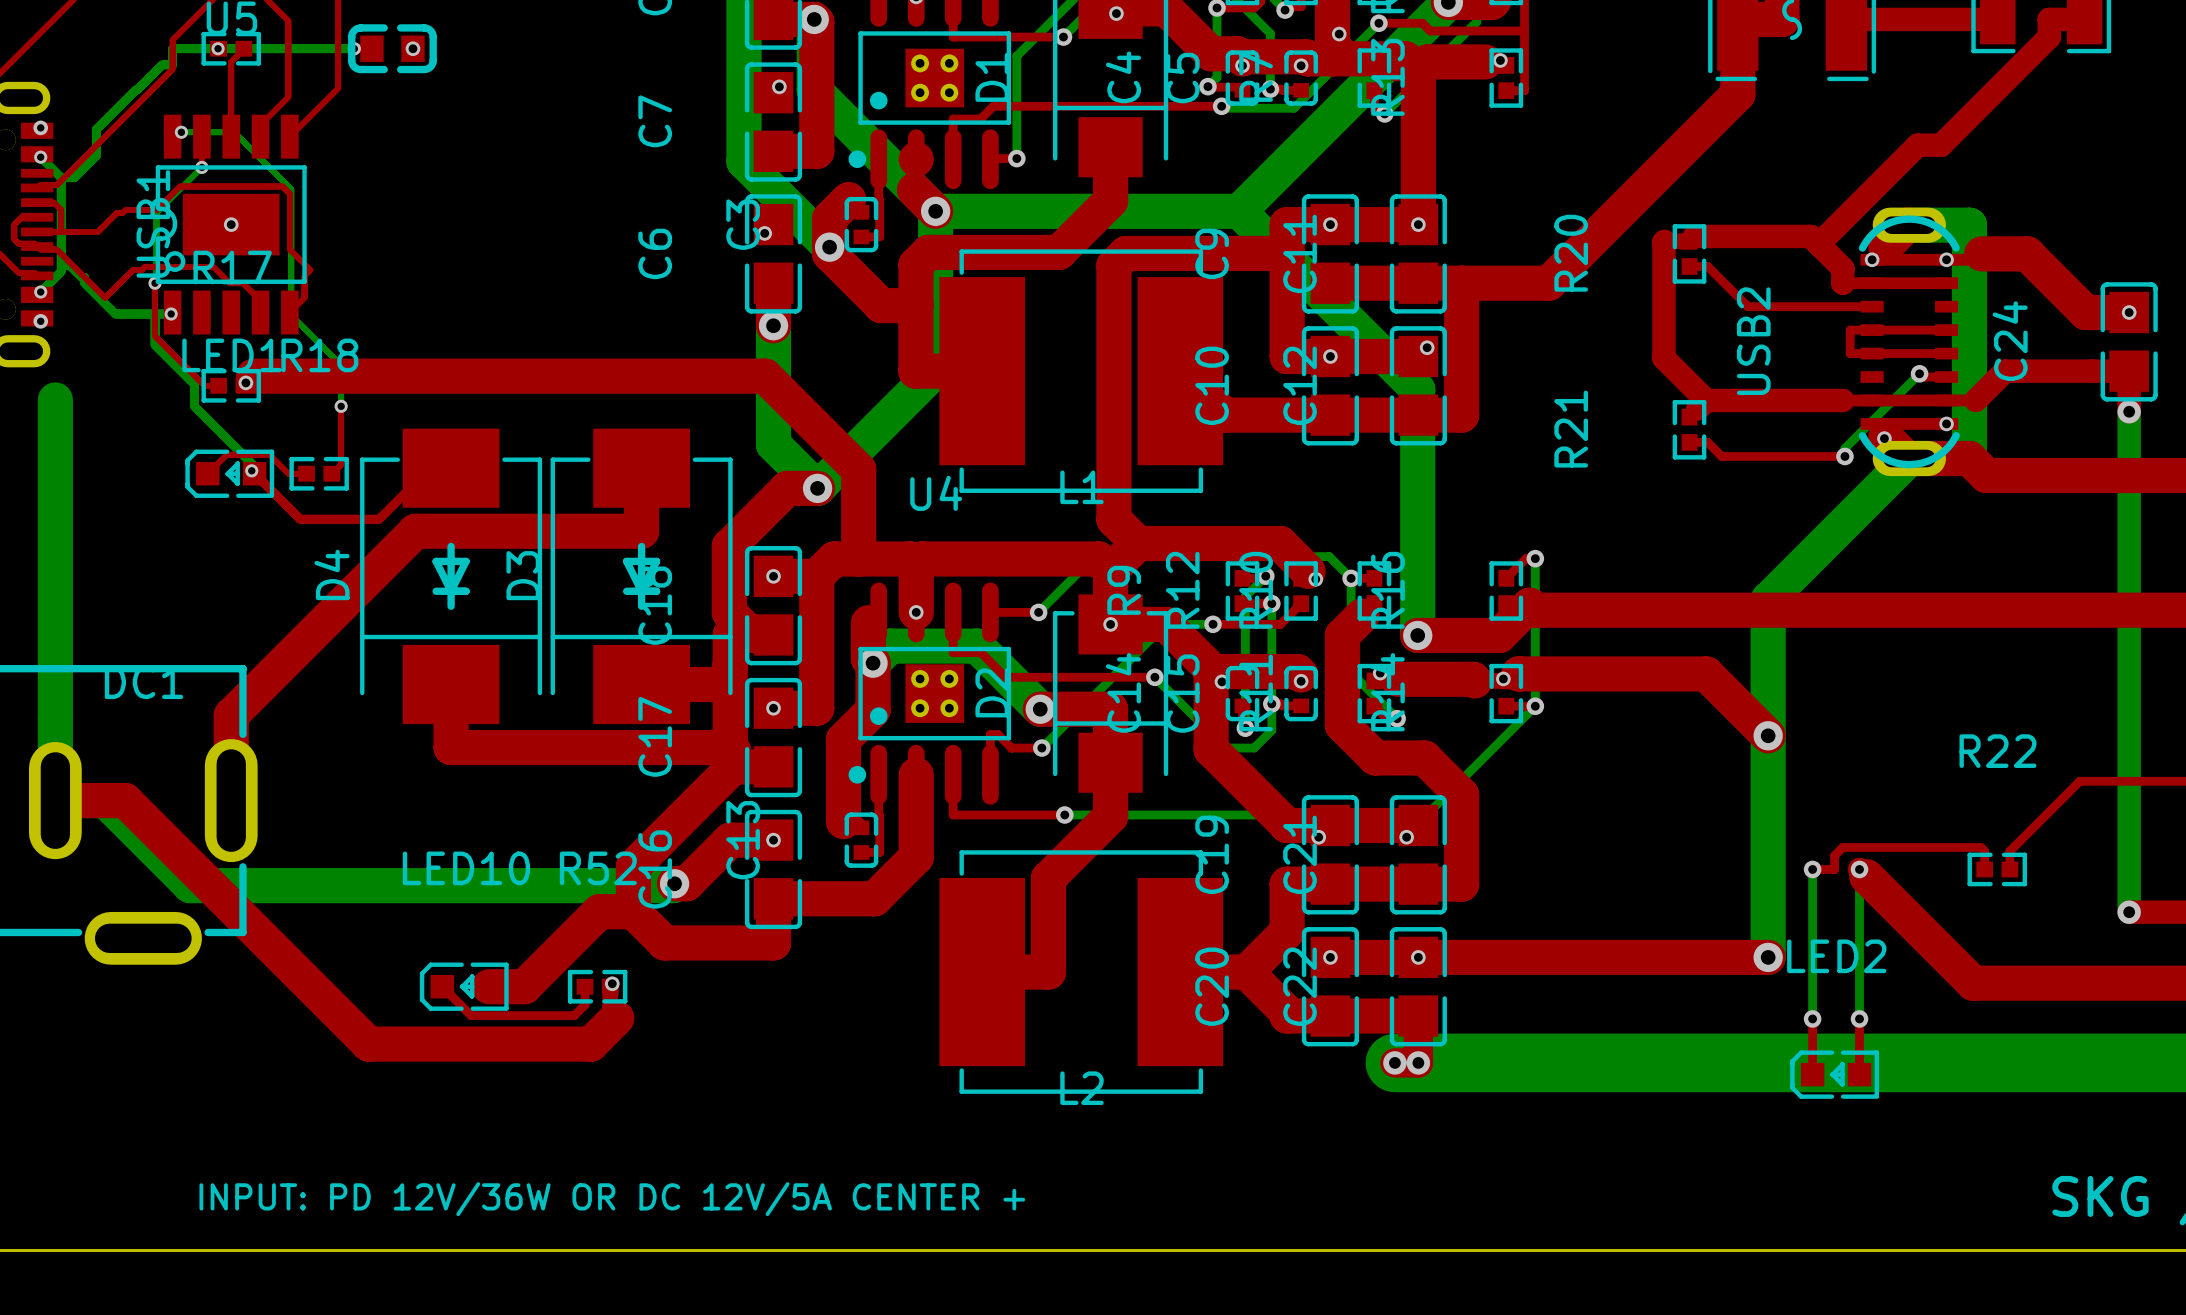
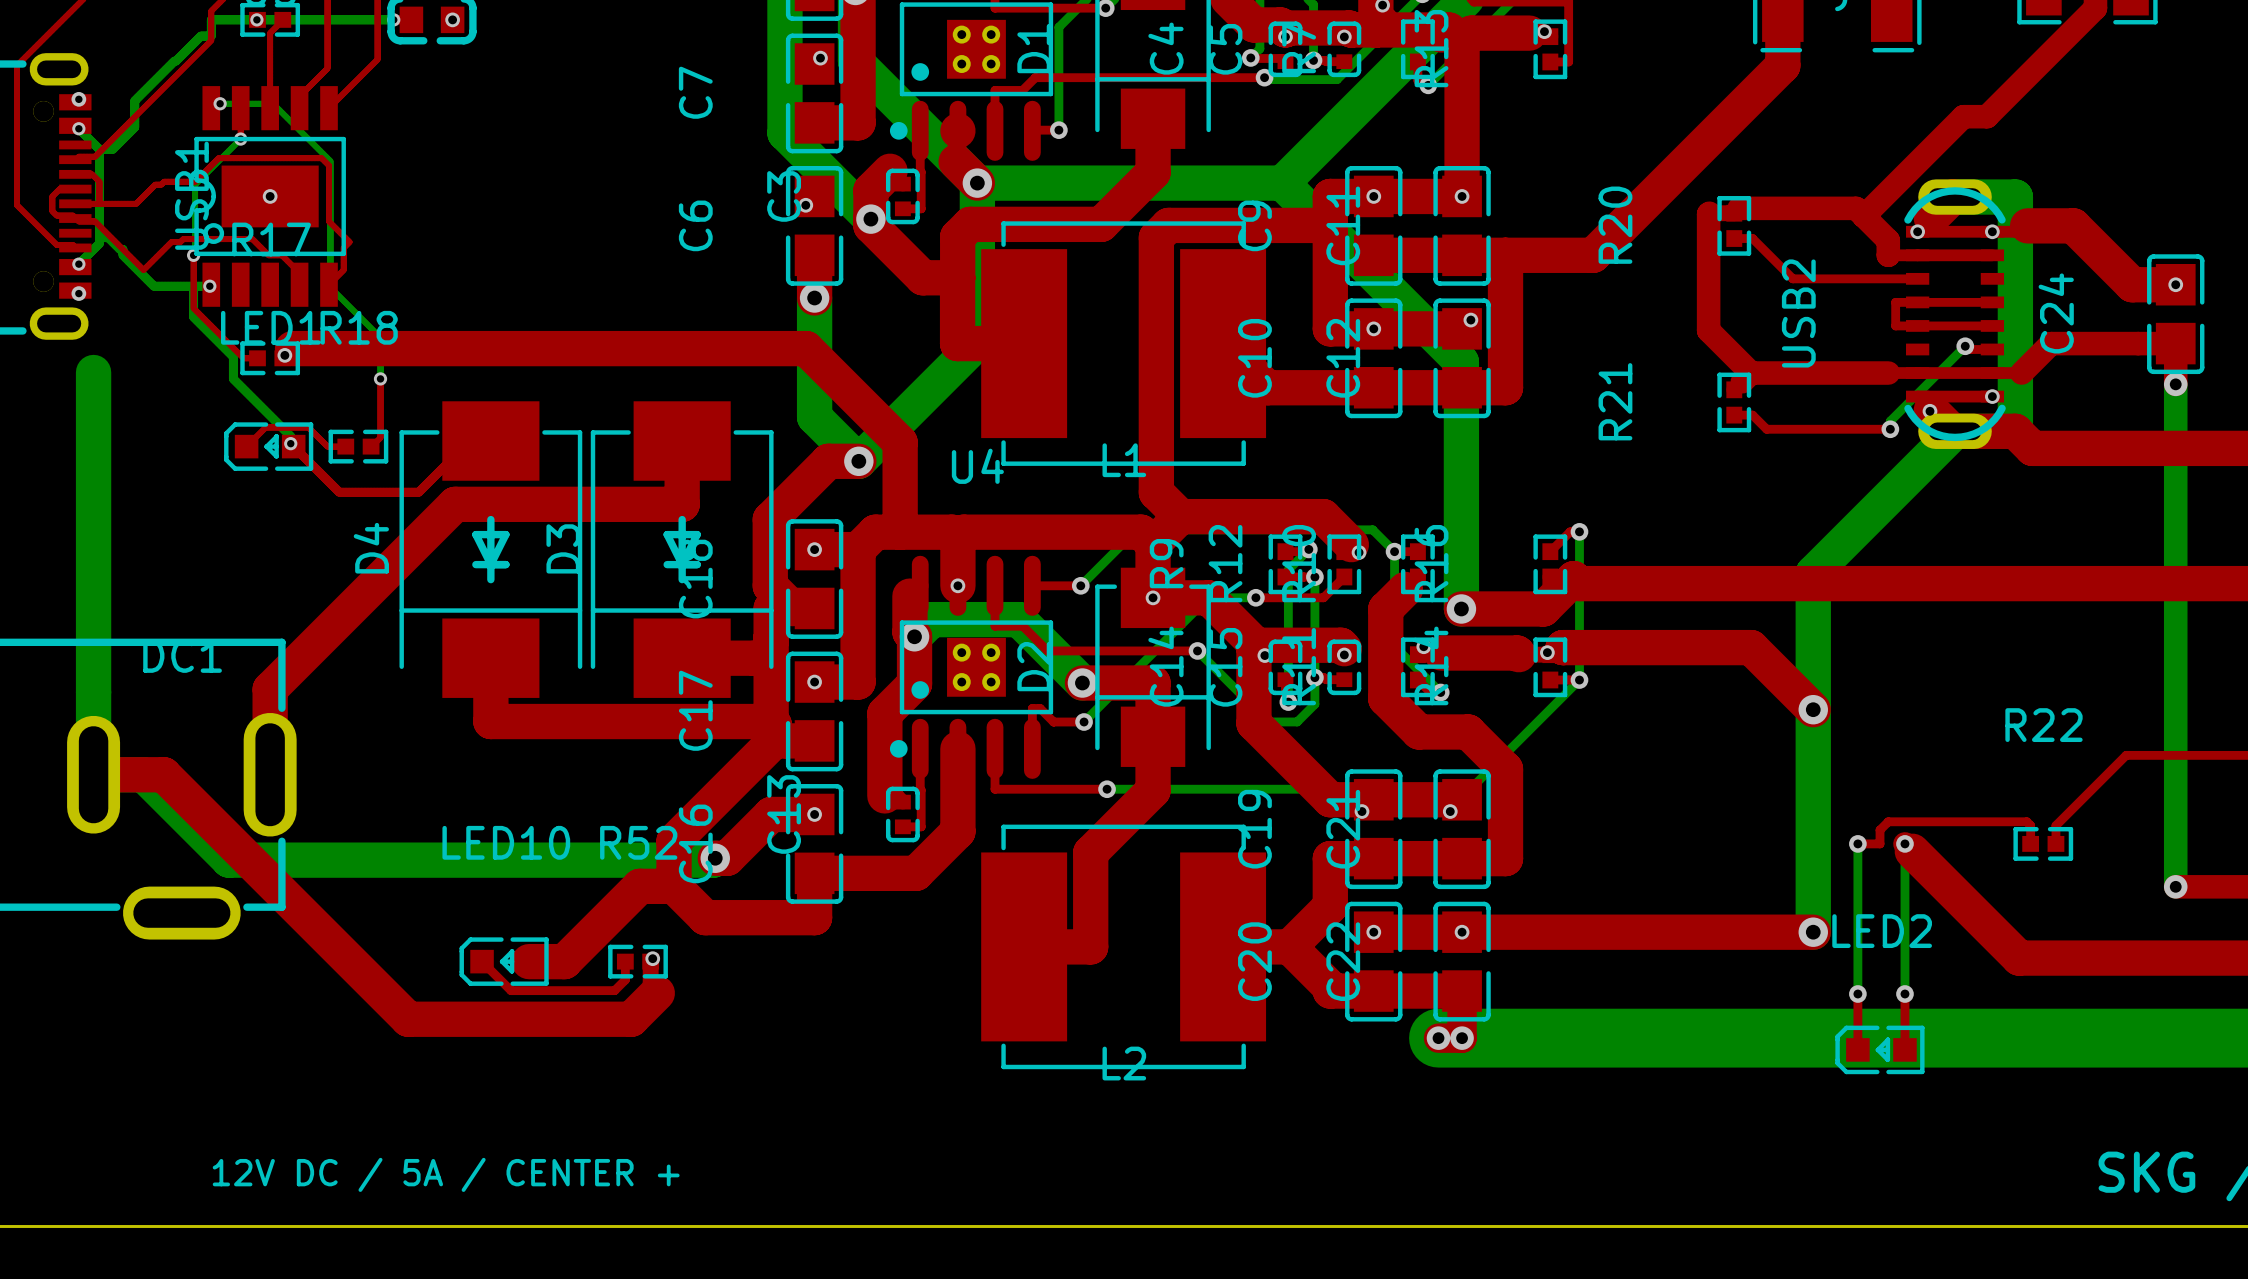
text: INPUT: PD 12V/36W OR DC 12V/5A CENTER + (612, 1199) -> 12V DC / 5A / CENTER + (446, 1174)

